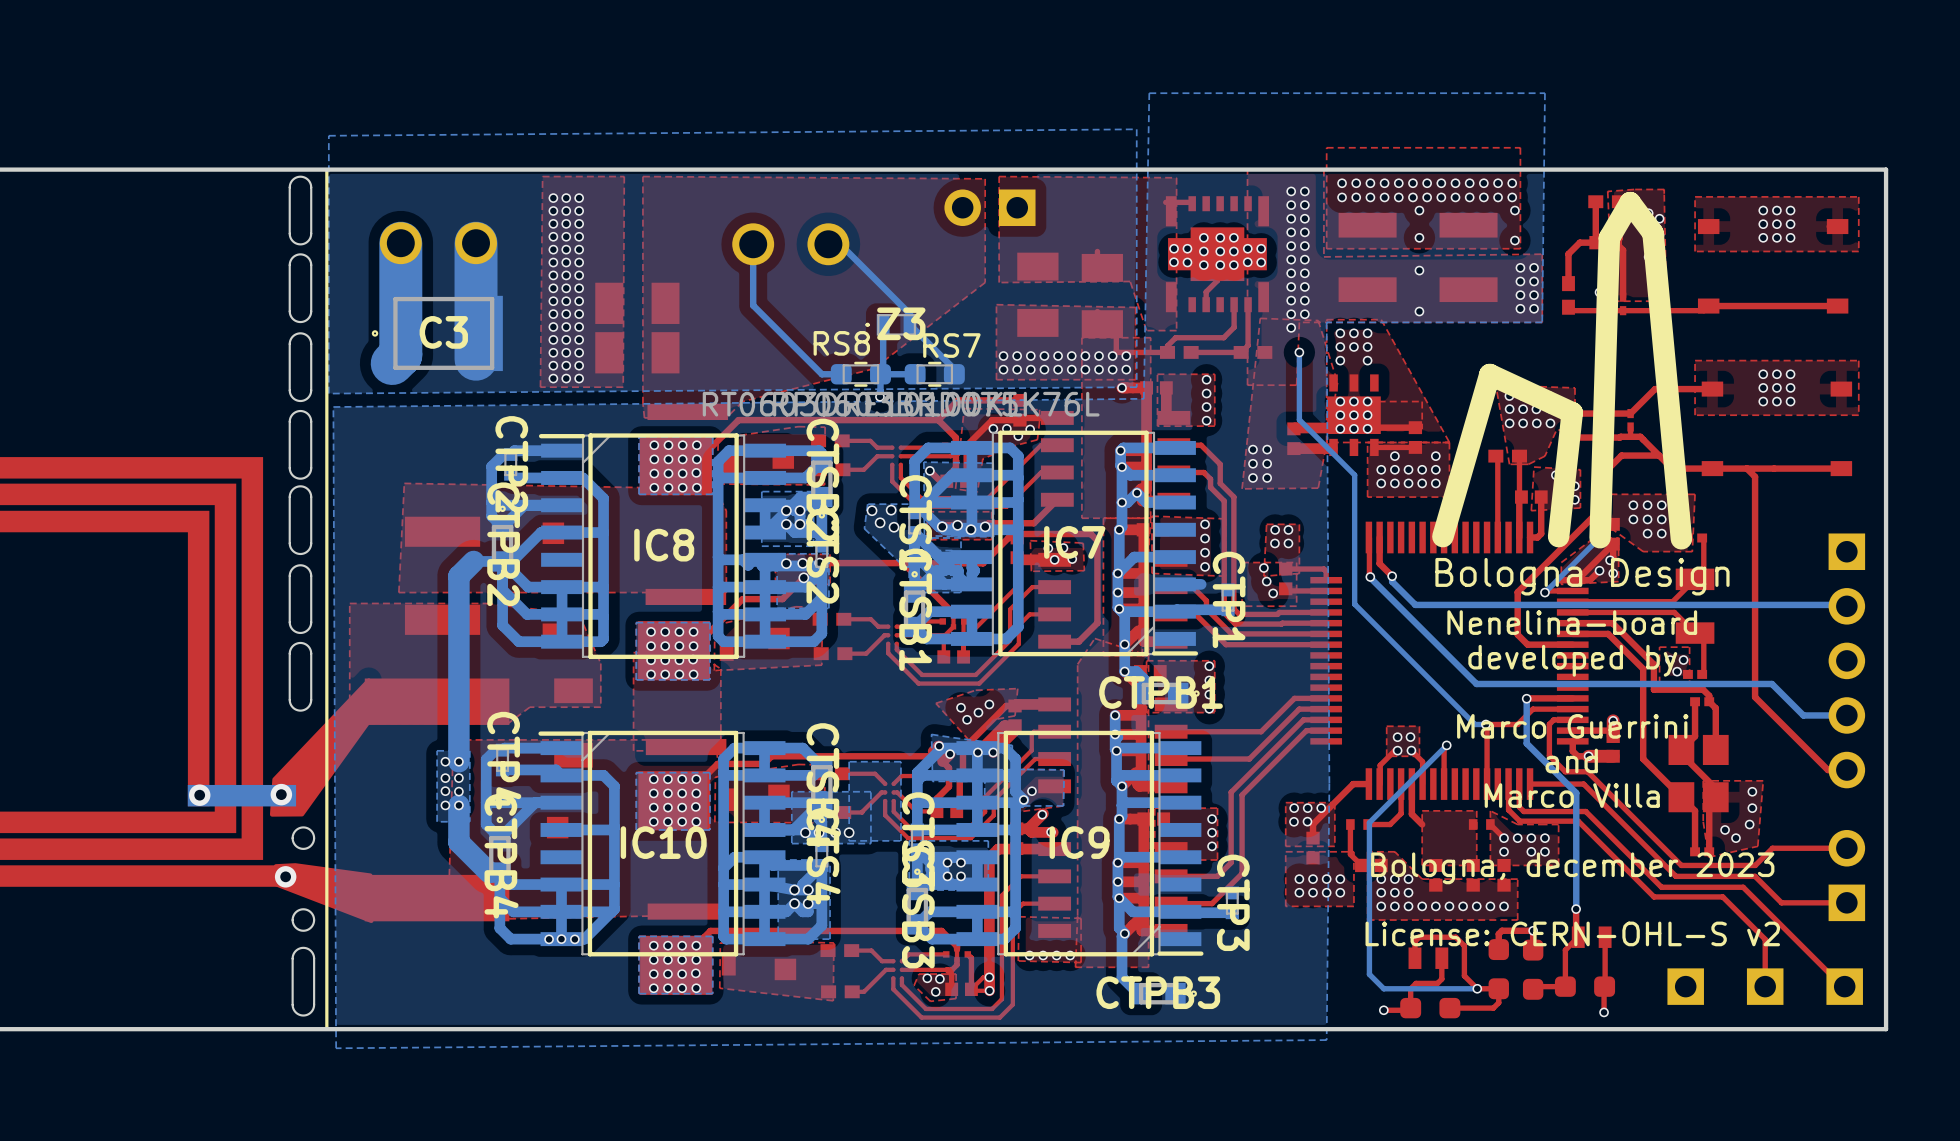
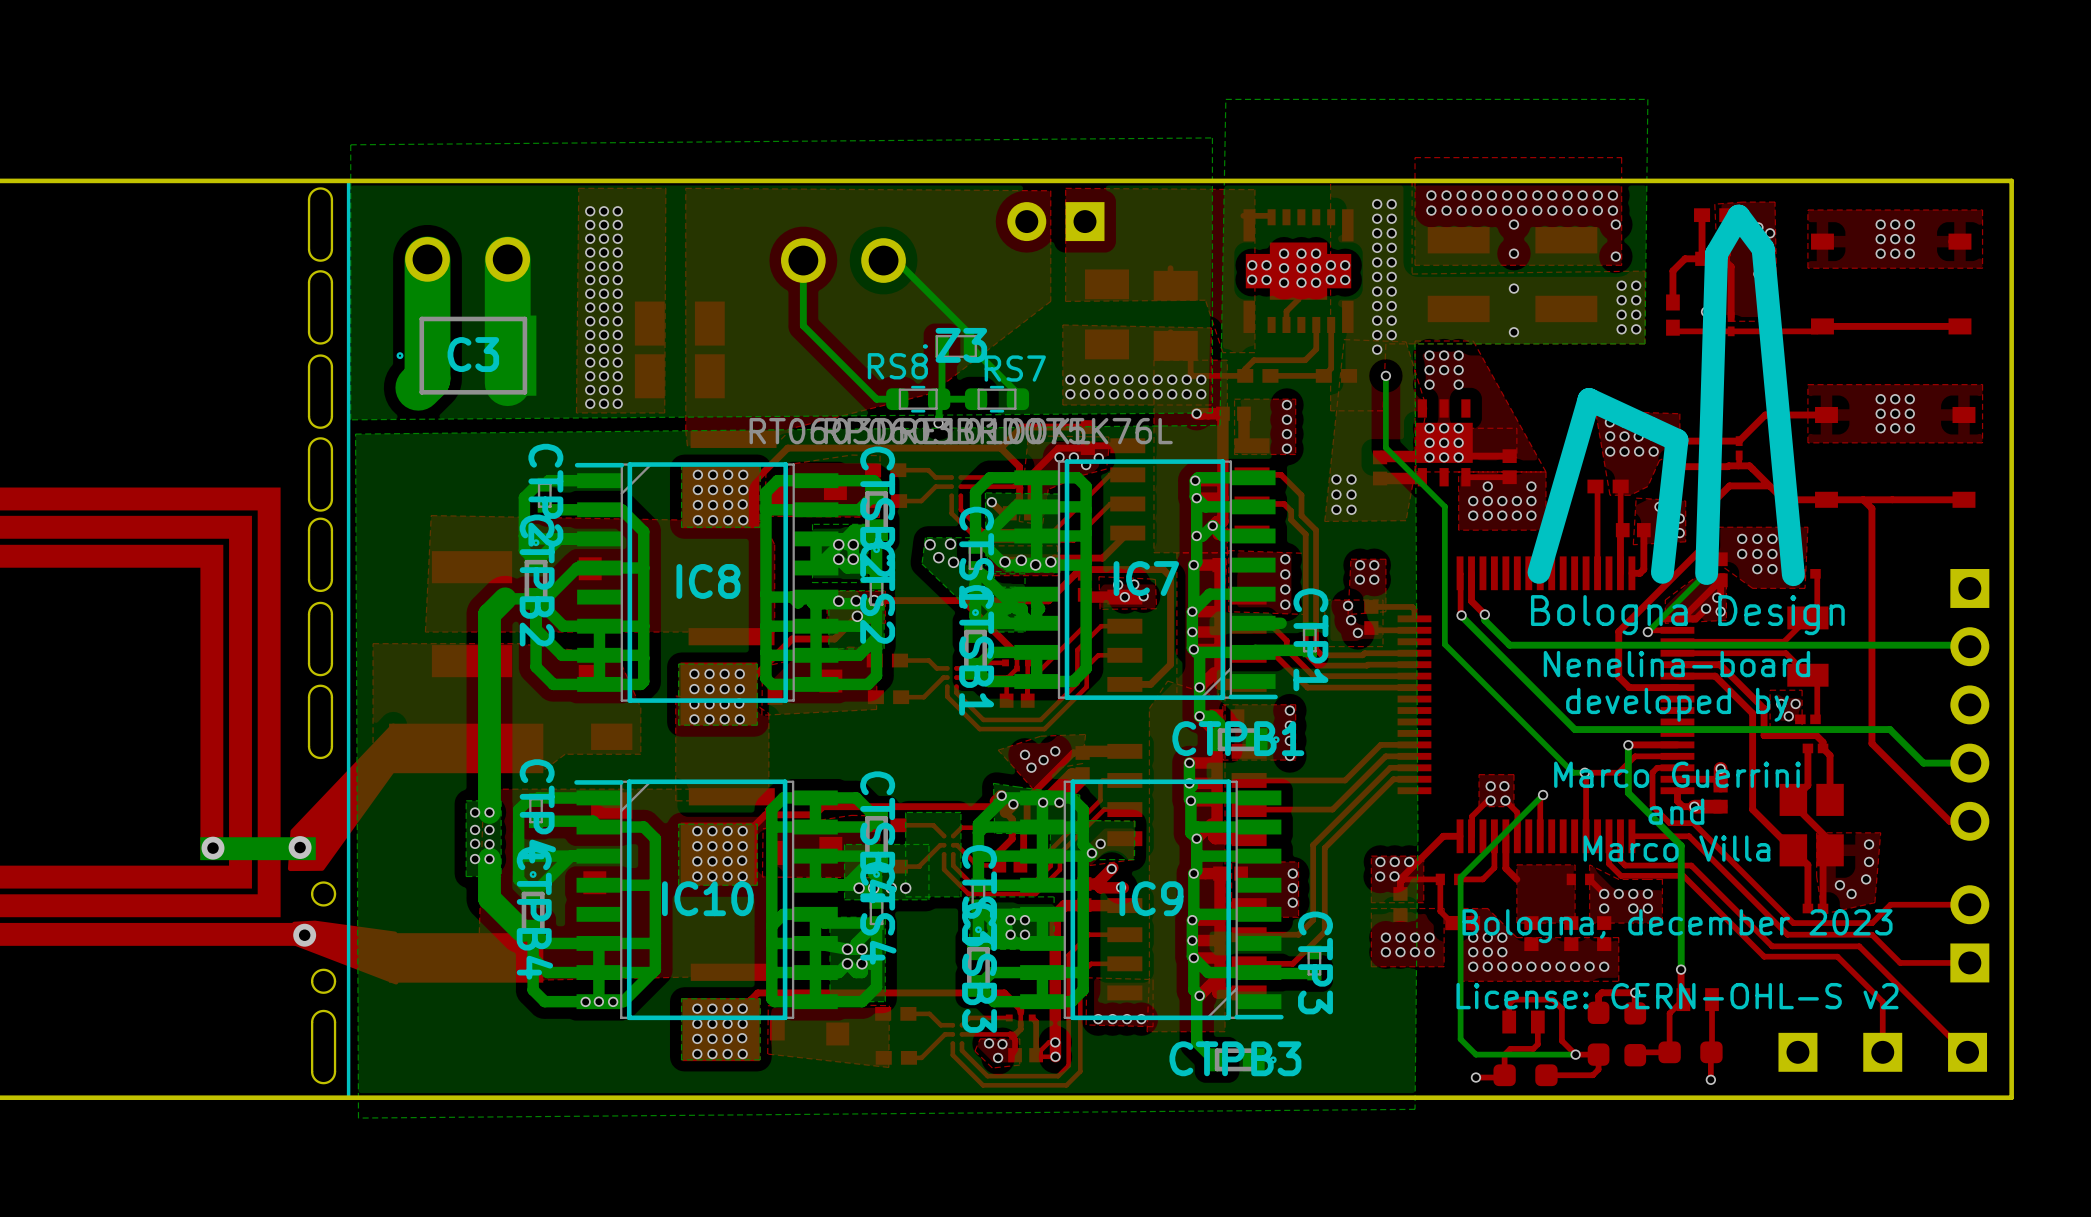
top track: none -> (1440, 879) (1403, 879) (1400, 882)

